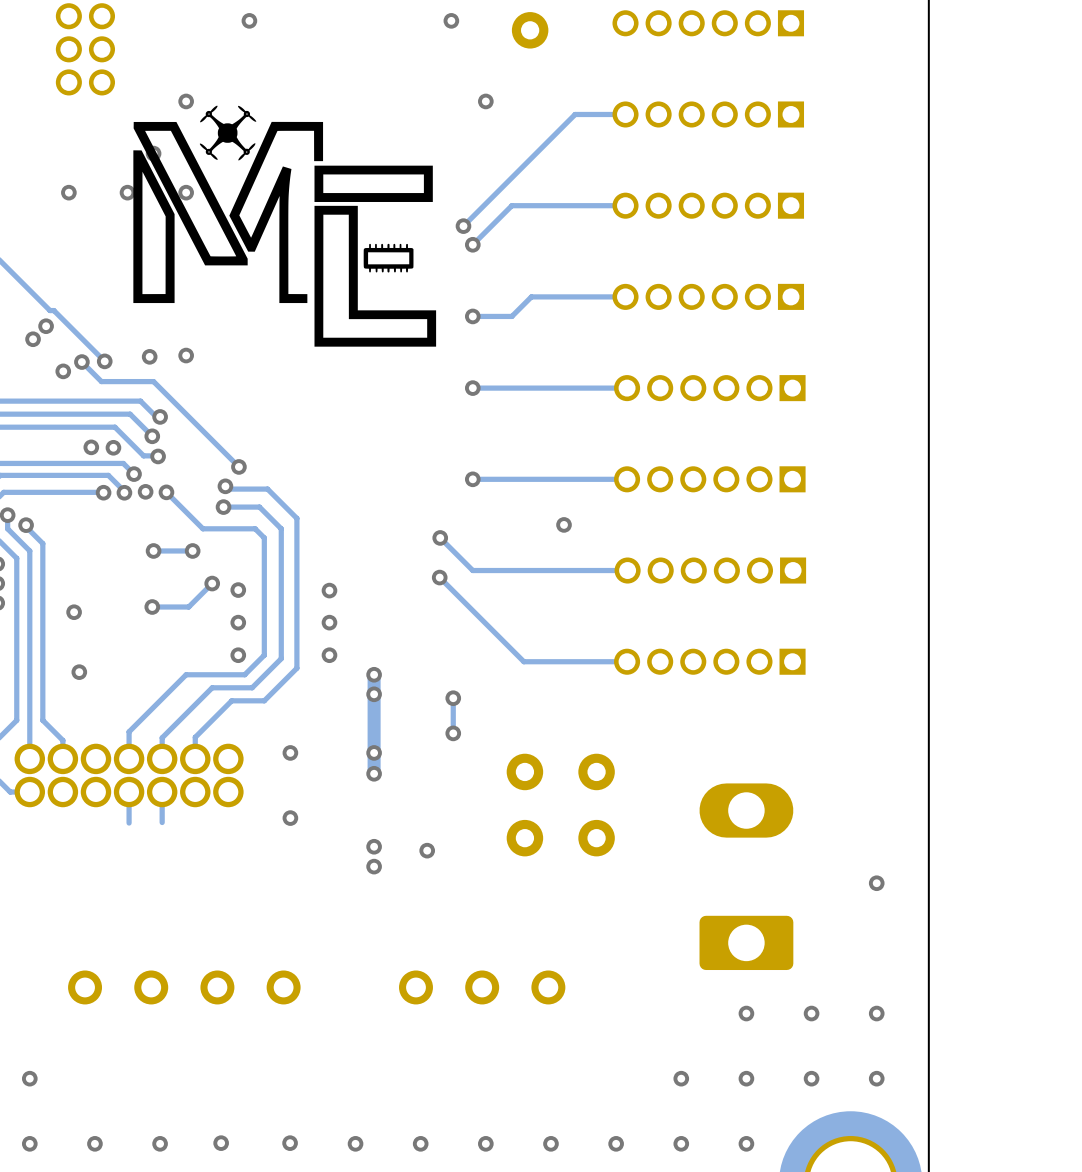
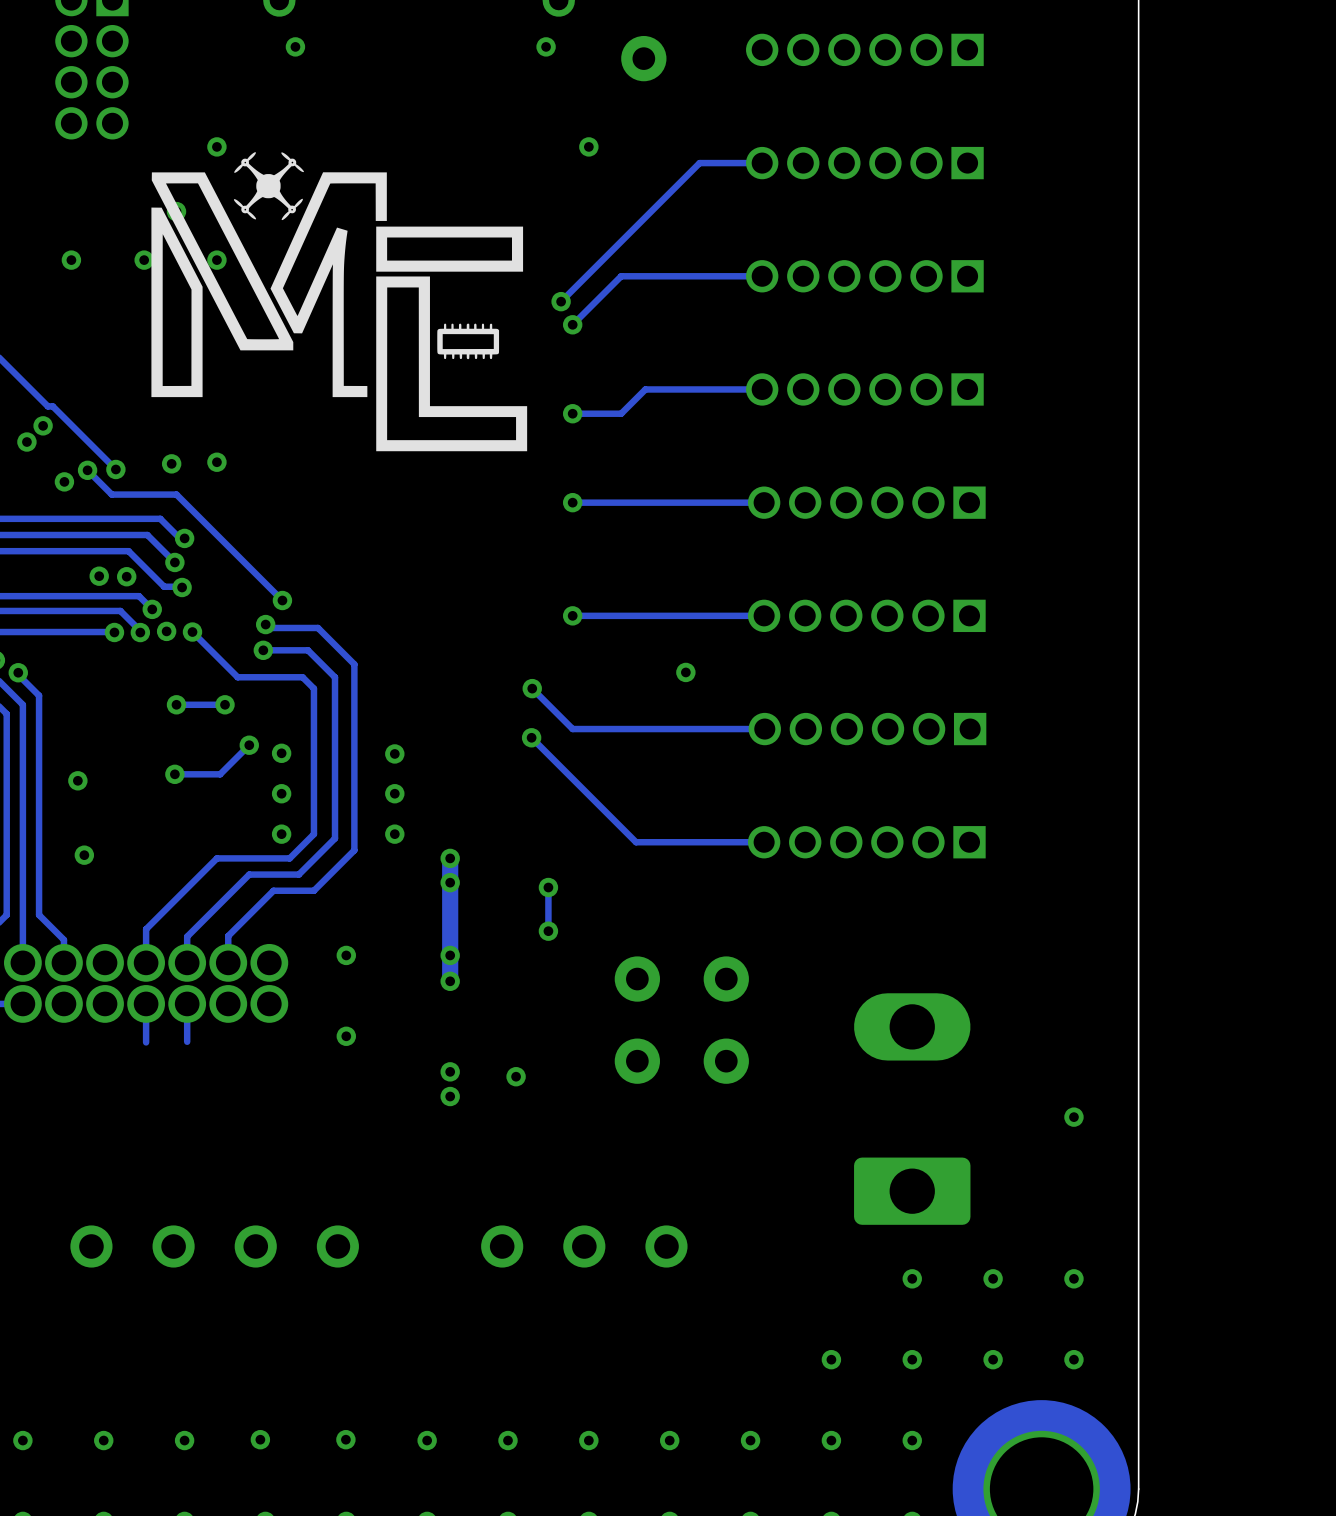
via: (29, 1078) -> none

